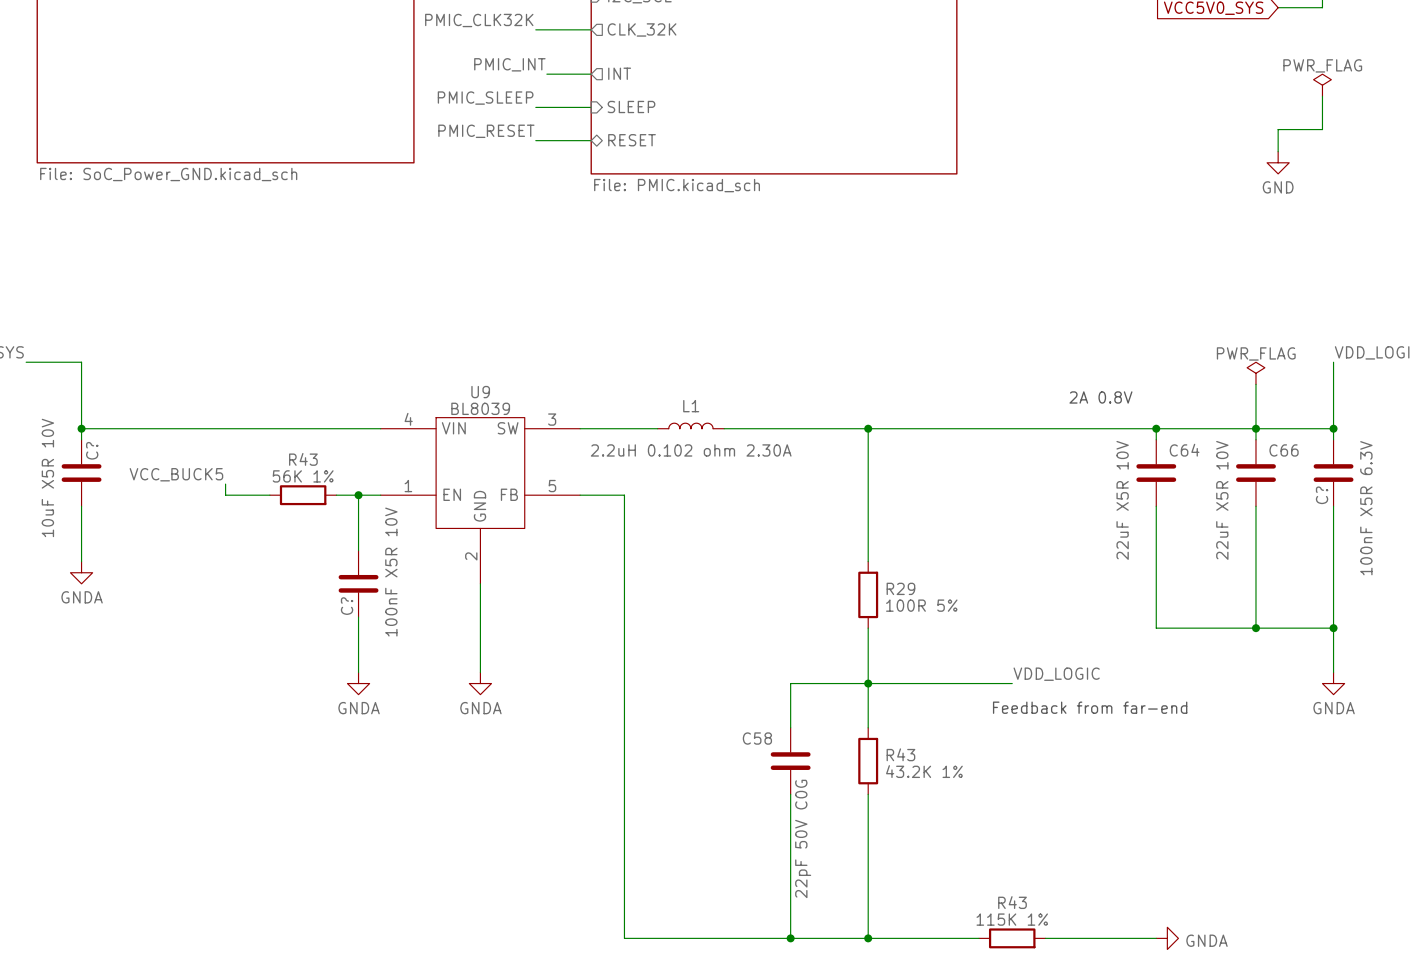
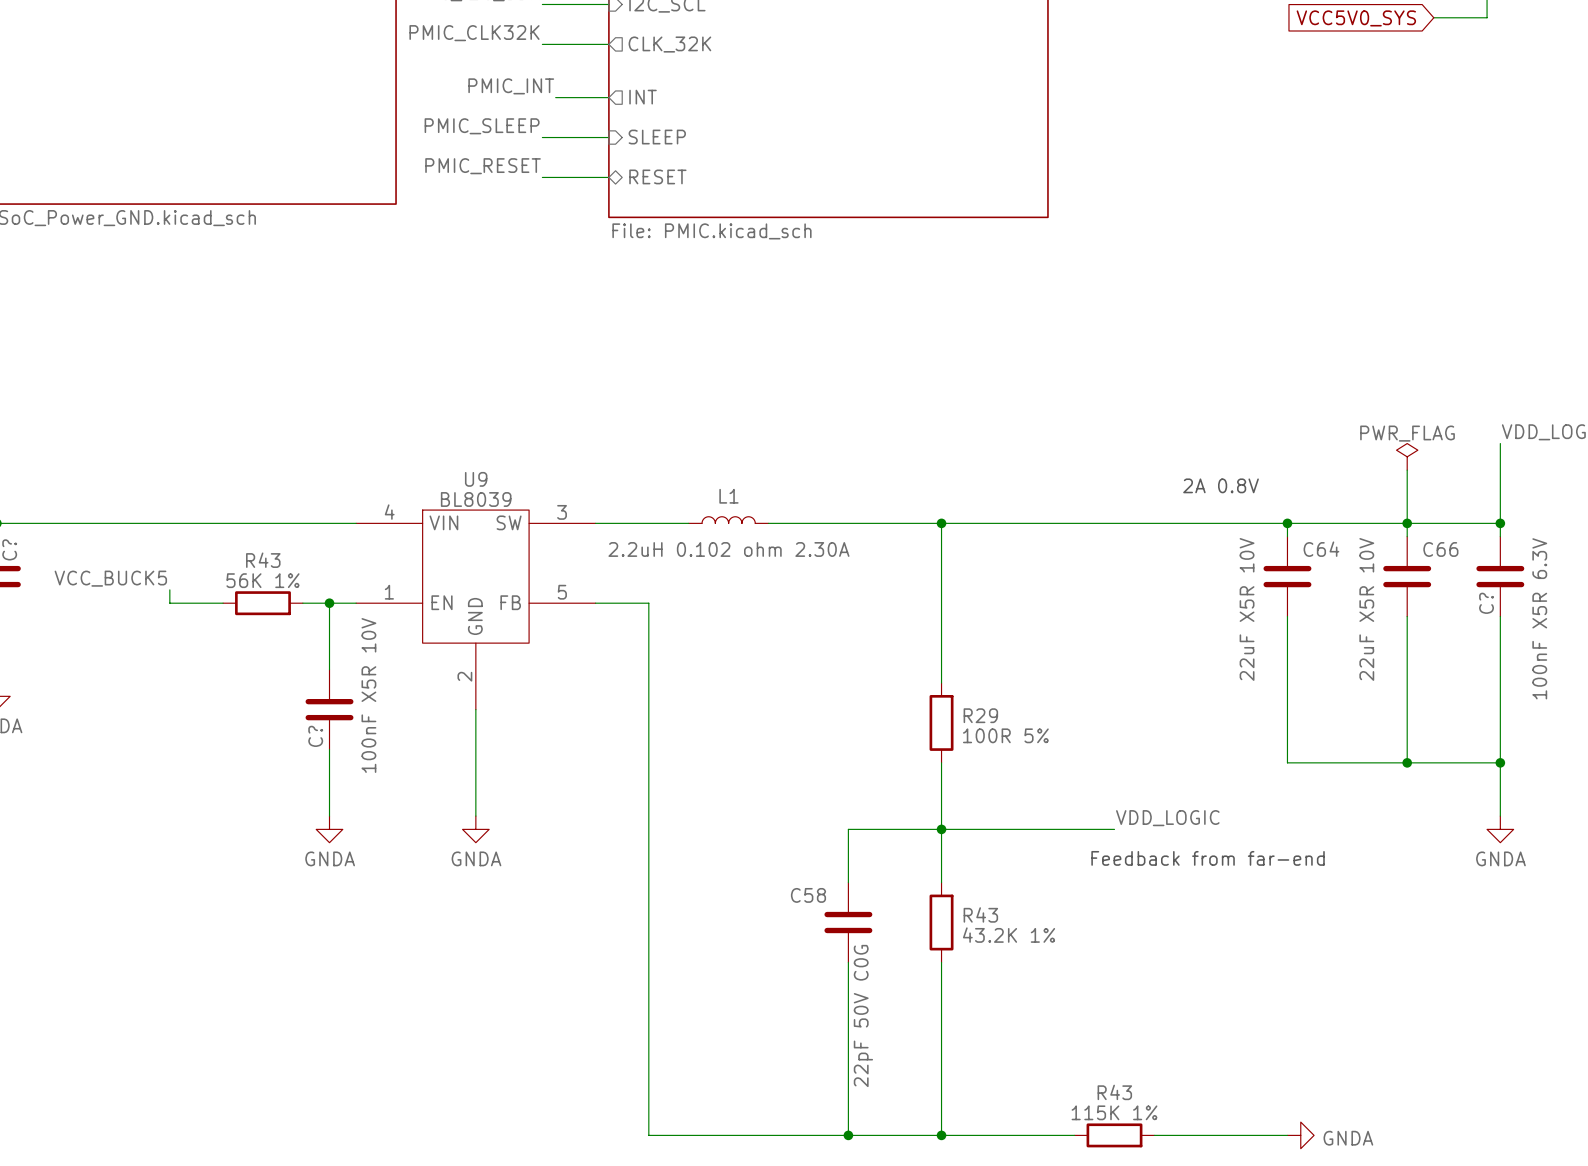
power symbol: PWR_FLAG (1322, 85) -> none
wire: (1322, 96) (1322, 129) (1278, 129) (1278, 151) -> none
power symbol: GND (1278, 162) -> none

